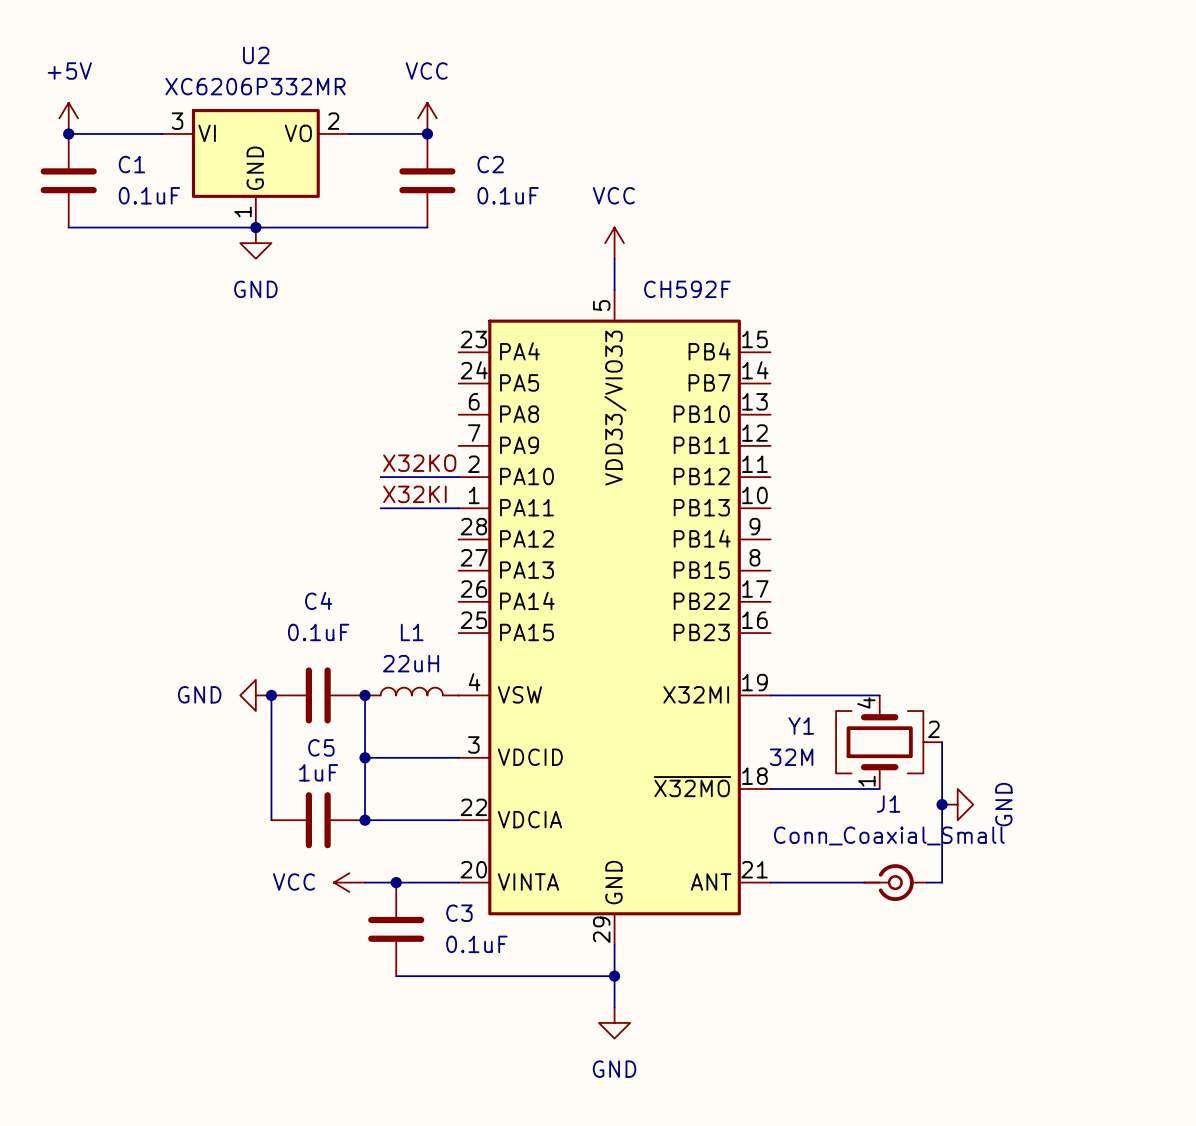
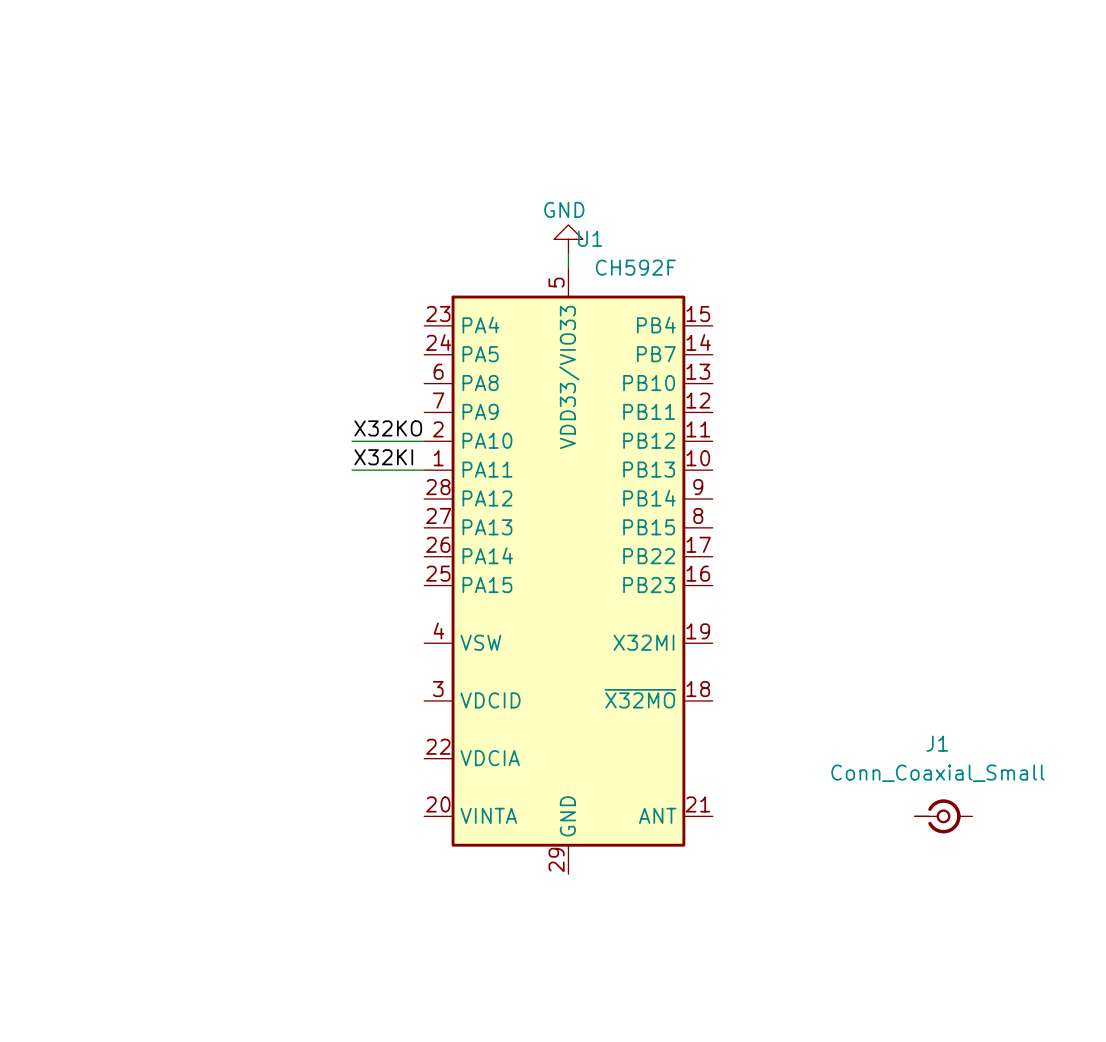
power symbol: +5V (68, 118) -> none
power symbol: VCC (427, 118) -> none
wire: (68, 133) (162, 133) -> none
junction: (68, 133) -> none
wire: (349, 133) (427, 133) -> none
junction: (427, 133) -> none
U2: XC6206P332MR (255, 168) -> none
C1: 0.1uF (68, 180) -> none
C2: 0.1uF (427, 180) -> none
wire: (68, 227) (427, 227) -> none
junction: (255, 227) -> none
power symbol: GND (255, 243) -> none
power symbol: VCC (614, 243) -> none
power symbol: none -> GND (568, 239)
part: CH592F (614, 617) -> none
U1: none -> CH592F (568, 571)
L1: 22uH (411, 691) -> none
power symbol: GND (255, 695) -> none
wire: (271, 695) (271, 820) -> none
junction: (271, 695) -> none
C4: 0.1uF (318, 695) -> none
wire: (365, 695) (365, 820) (458, 820) -> none
junction: (365, 695) -> none
wire: (770, 695) (879, 695) -> none
Y1: 32M (889, 742) -> none
wire: (942, 742) (942, 882) (926, 882) -> none
wire: (365, 757) (458, 757) -> none
junction: (365, 757) -> none
wire: (770, 789) (879, 789) -> none
junction: (942, 804) -> none
power symbol: GND (957, 804) -> none
C5: 1uF (318, 820) -> none
junction: (365, 820) -> none
power symbol: VCC (349, 882) -> none
wire: (365, 882) (458, 882) -> none
junction: (396, 882) -> none
wire: (770, 882) (864, 882) -> none
J1 position: (895, 882) -> (943, 816)
C3: 0.1uF (396, 929) -> none
wire: (614, 944) (614, 1007) -> none
wire: (396, 976) (614, 976) -> none
junction: (614, 976) -> none
power symbol: GND (614, 1022) -> none

